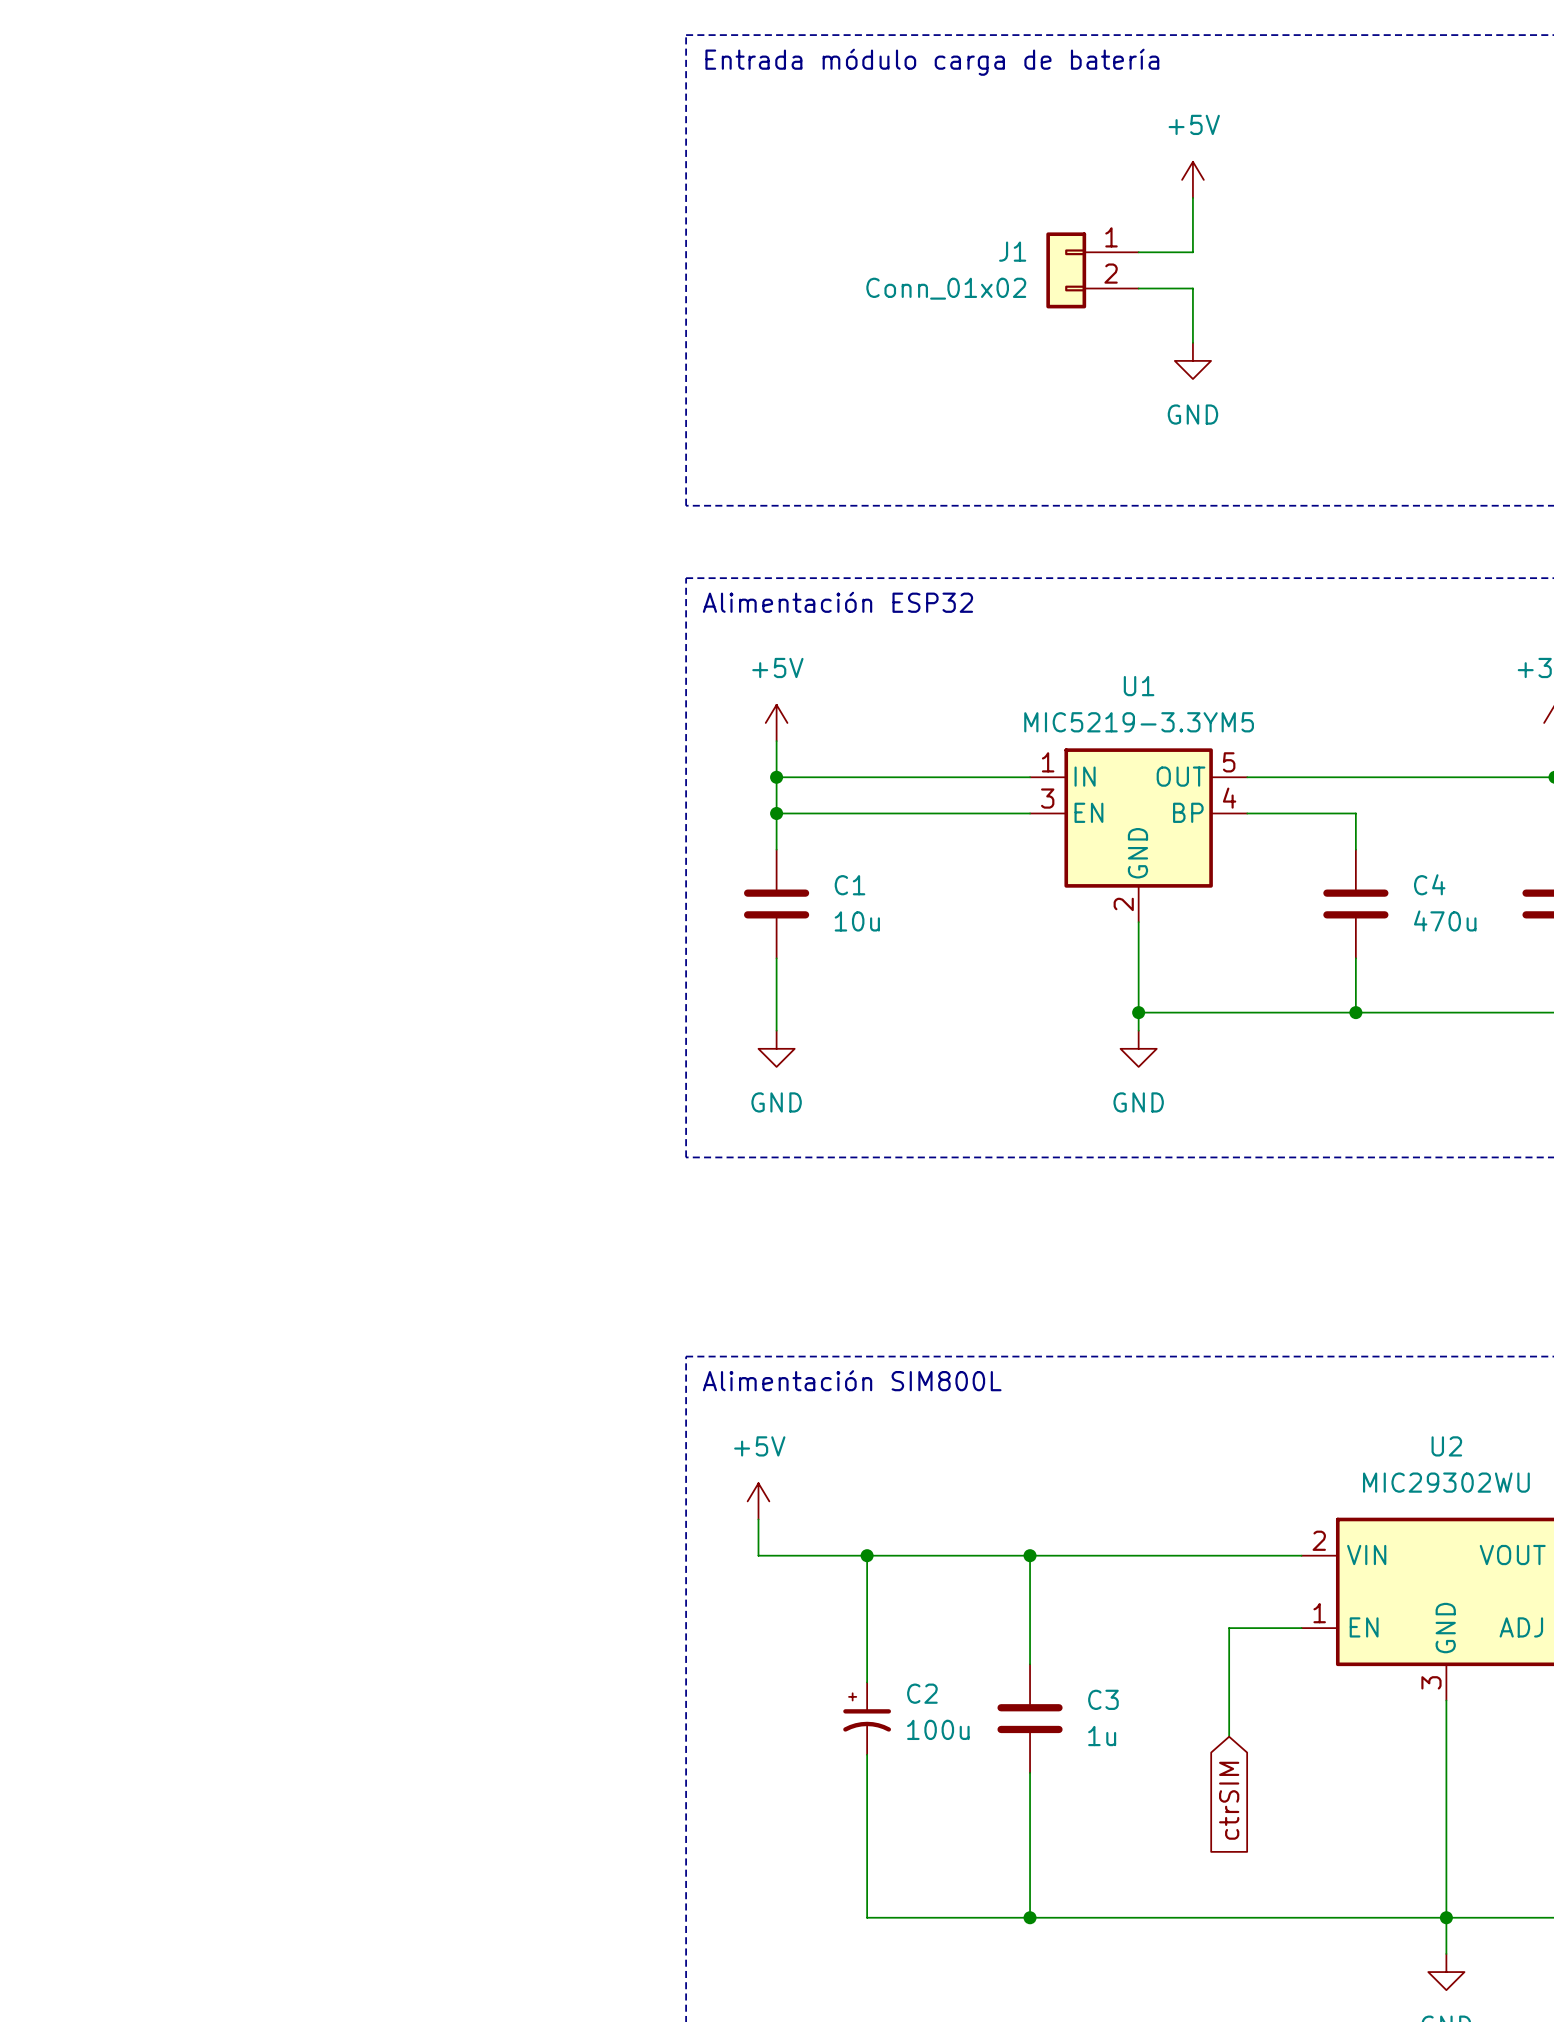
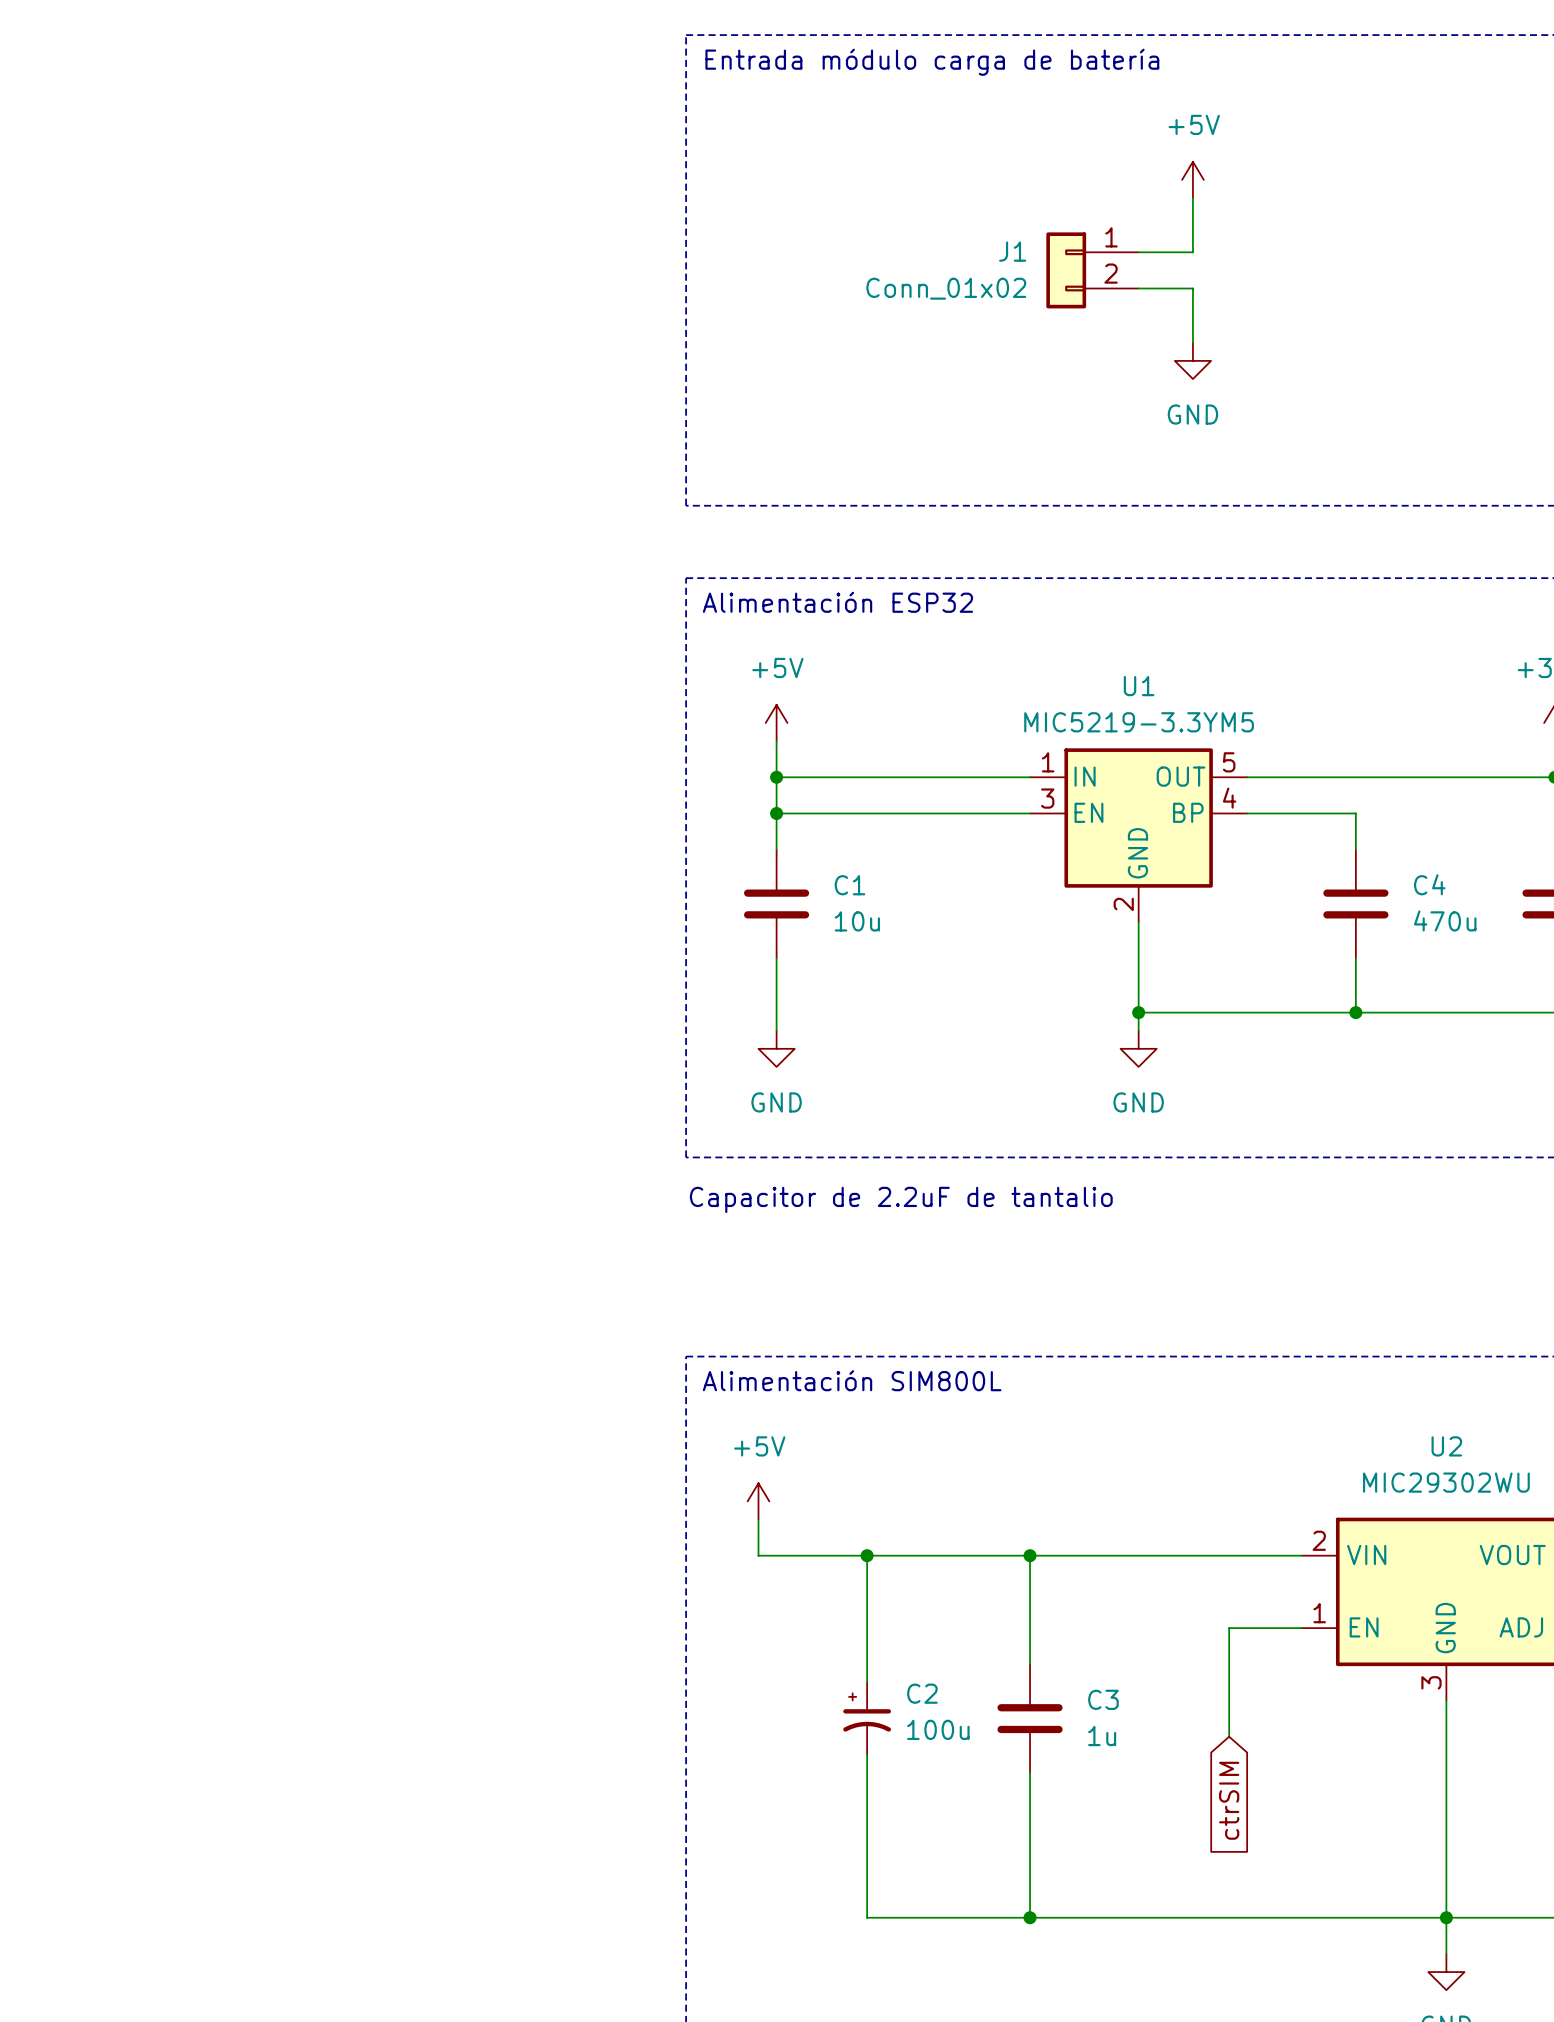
text: none -> Capacitor de 2.2uF de tantalio (901, 1199)

